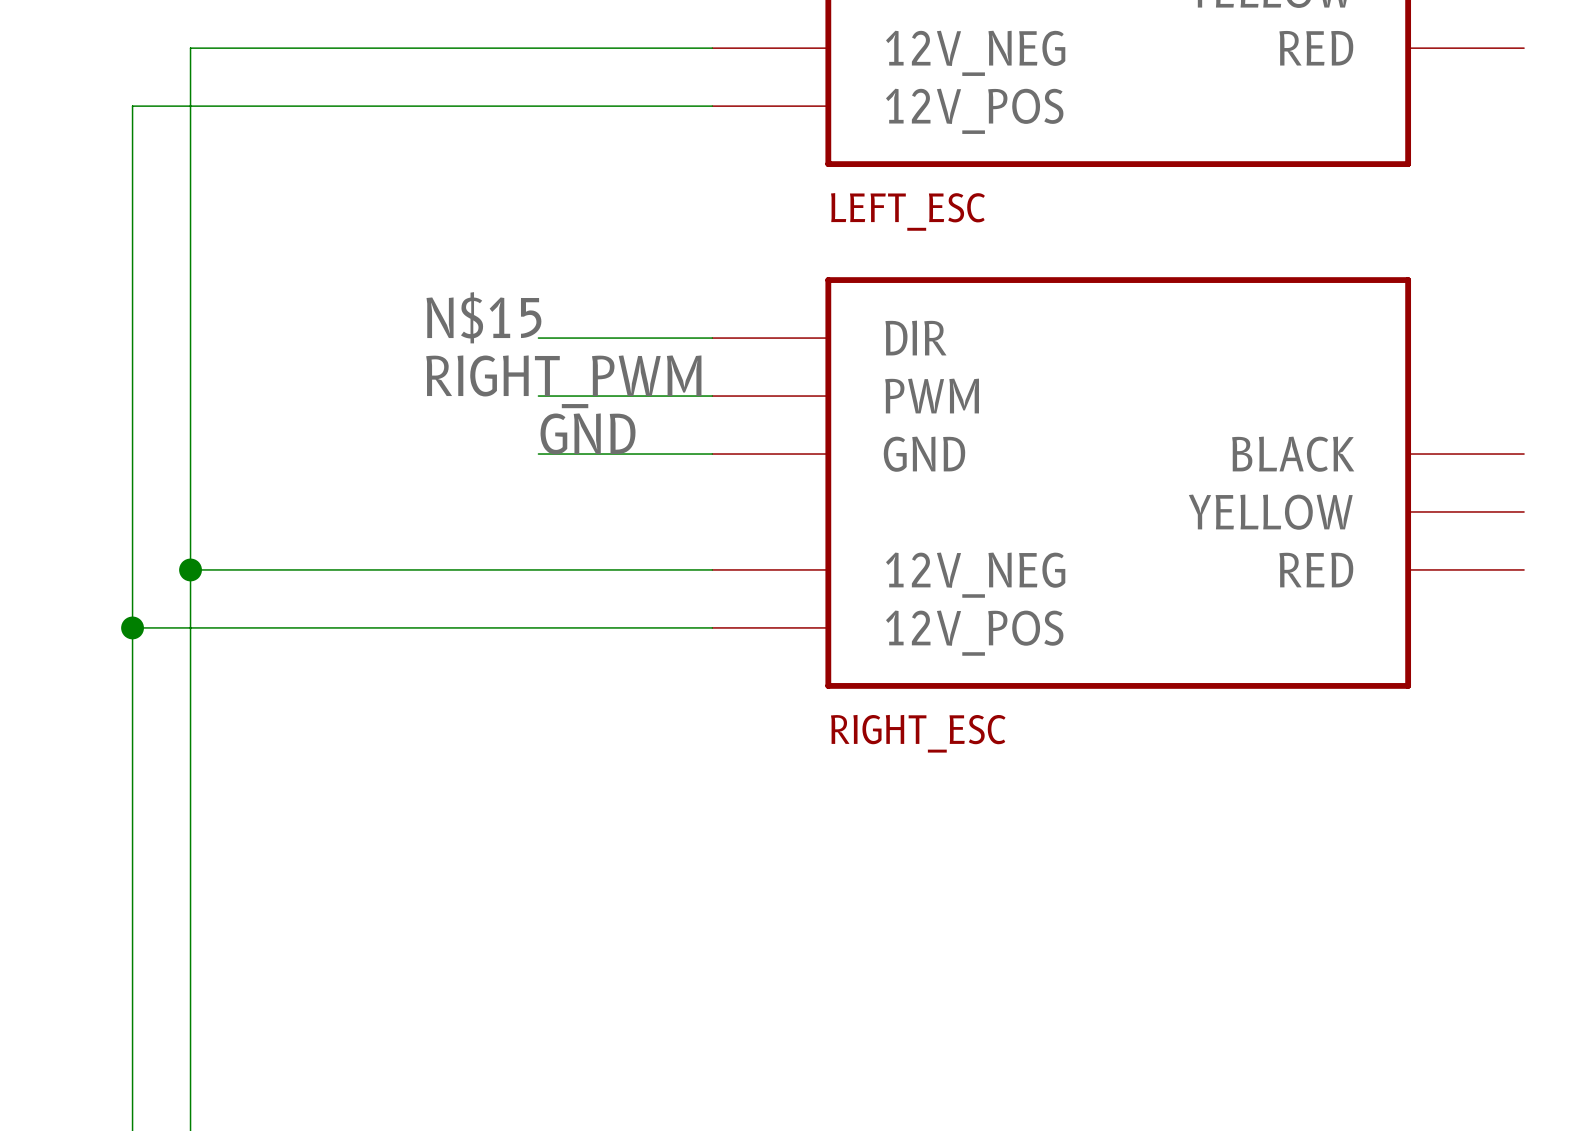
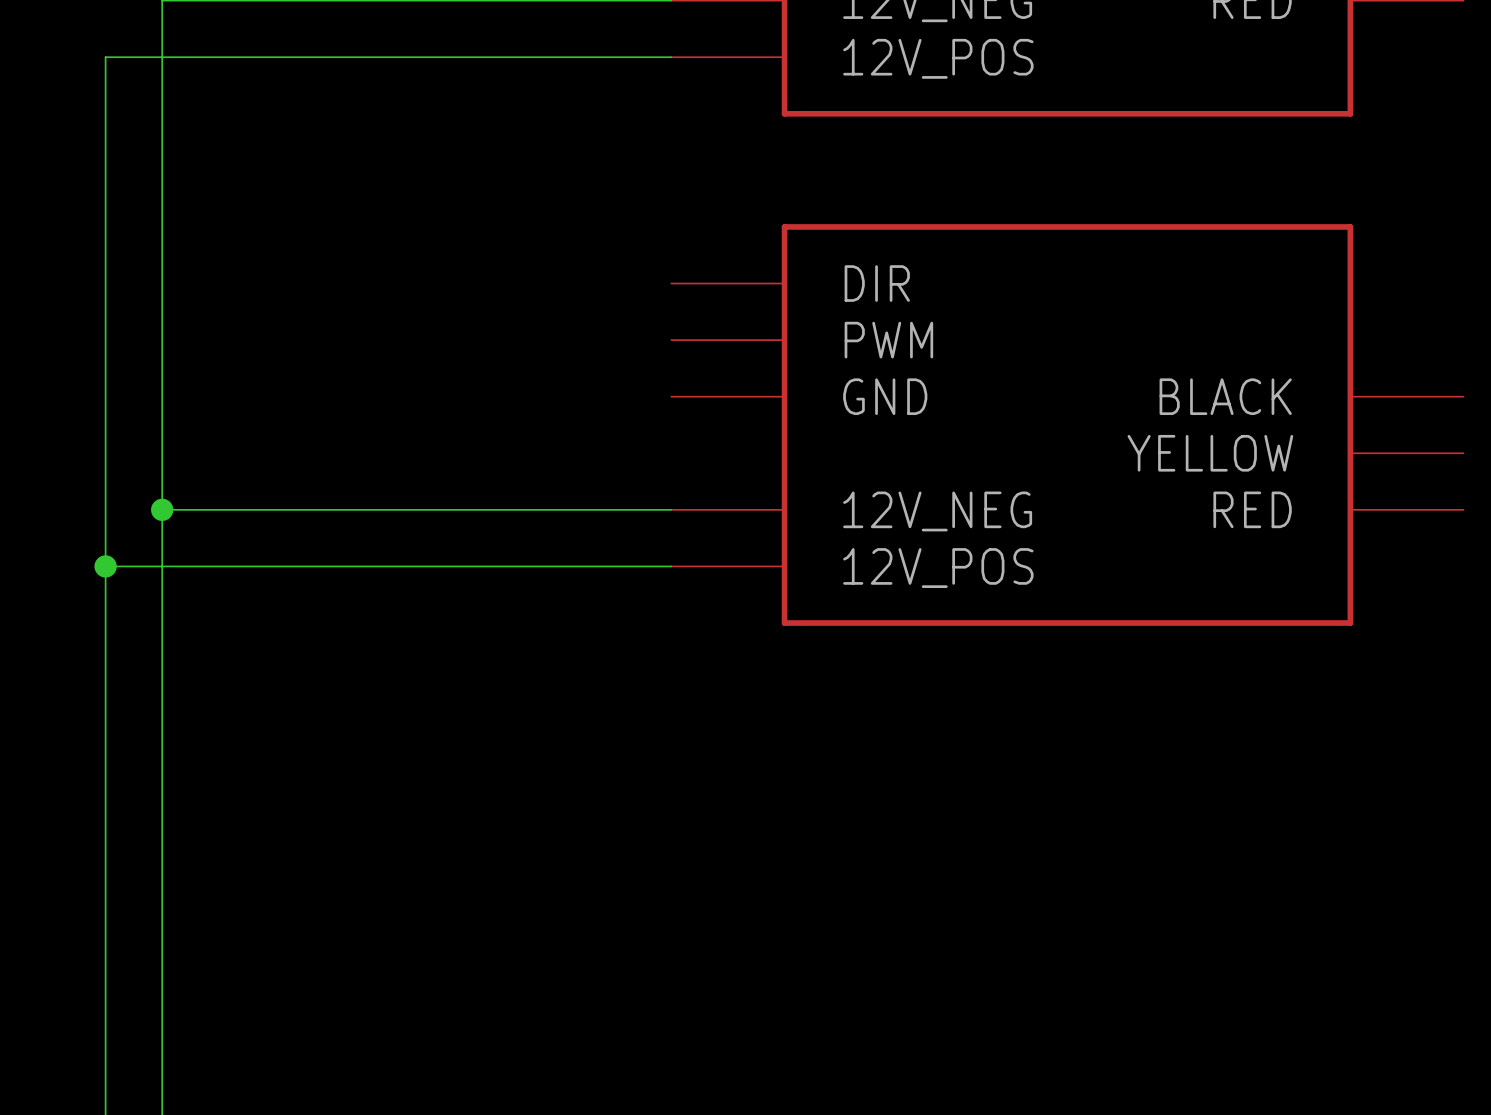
LEFT_ESC name: LEFT_ESC (907, 211) -> none
label: N$15 (483, 317) -> none
wire: (538, 338) (712, 338) -> none
label: RIGHT_PWM (563, 381) -> none
wire: (538, 396) (712, 396) -> none
label: GND (588, 433) -> none
wire: (538, 454) (712, 454) -> none
RIGHT_ESC name: RIGHT_ESC (918, 733) -> none

